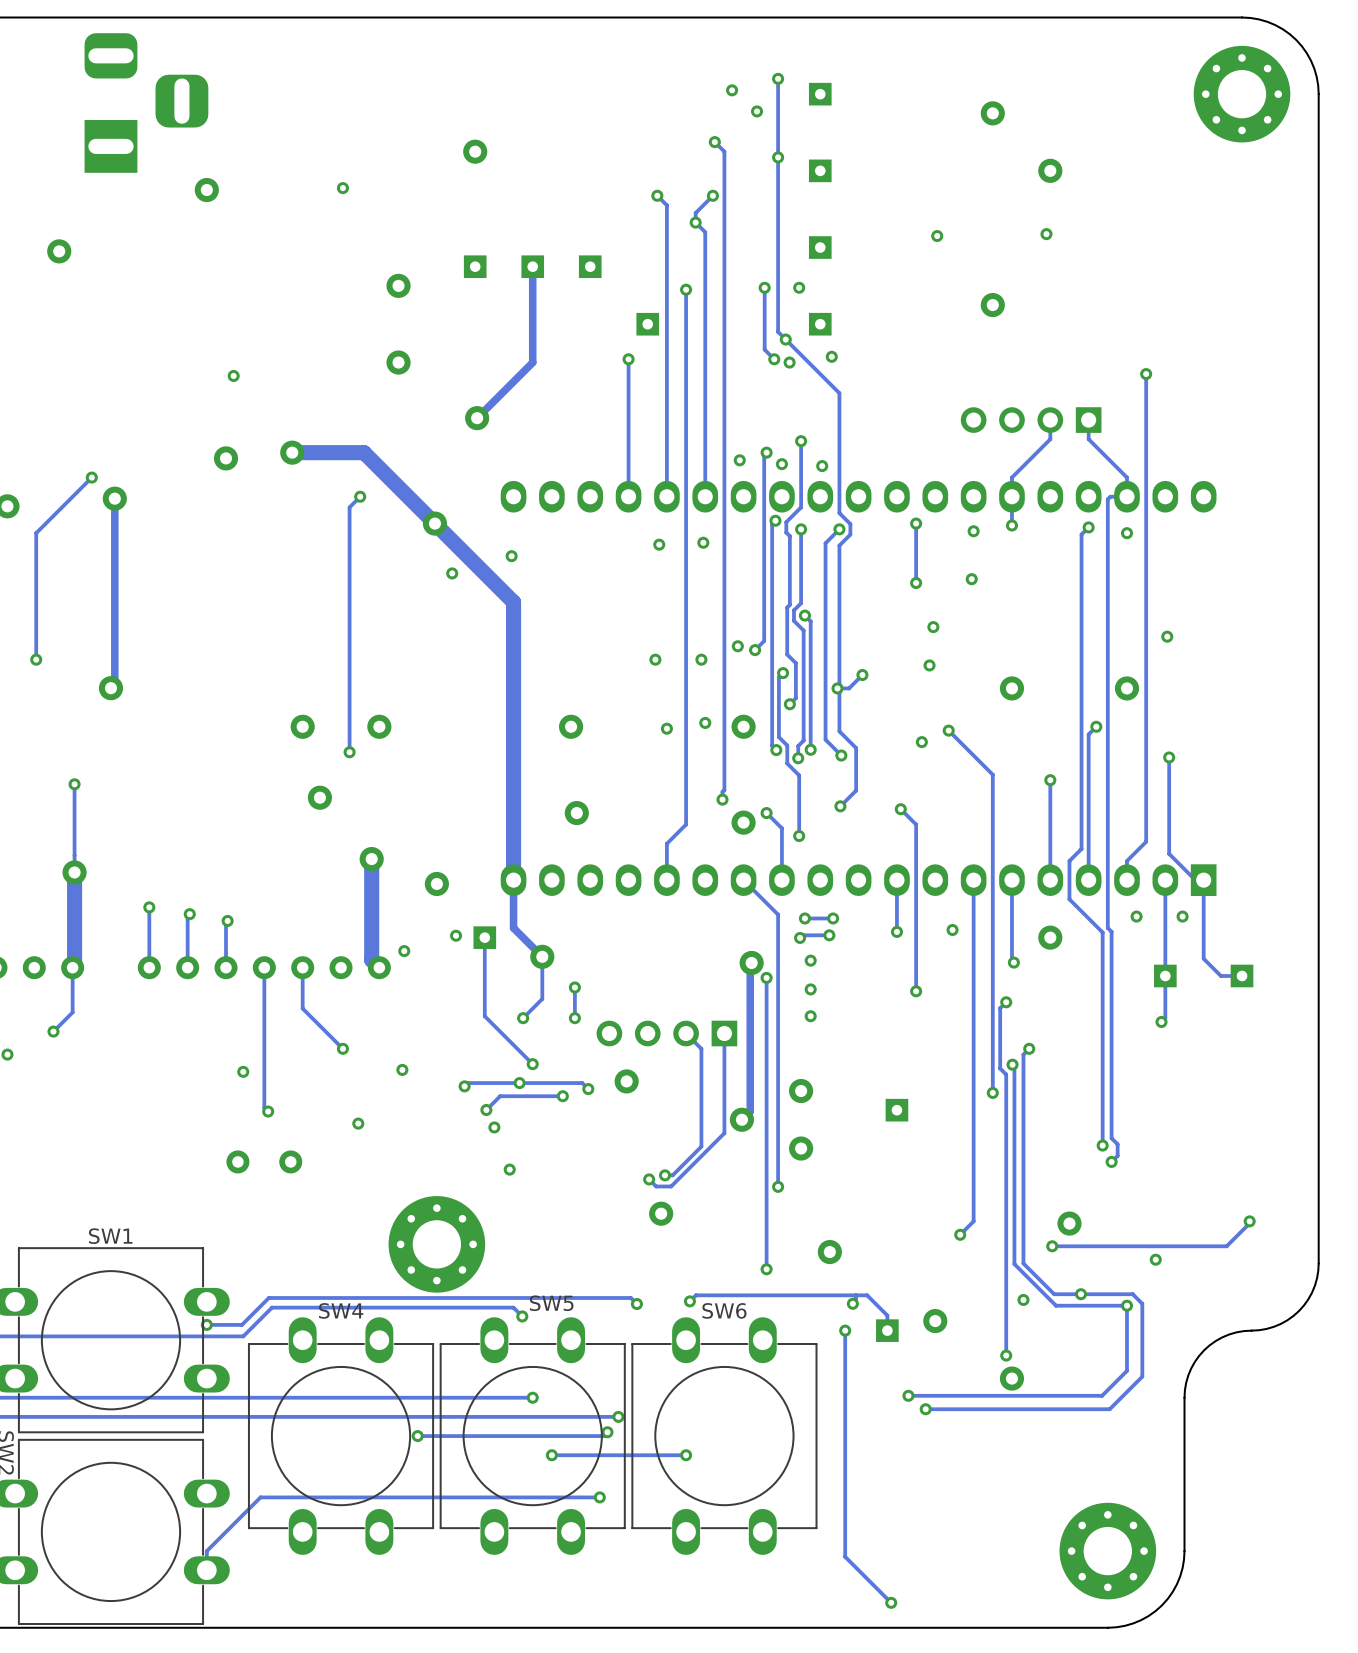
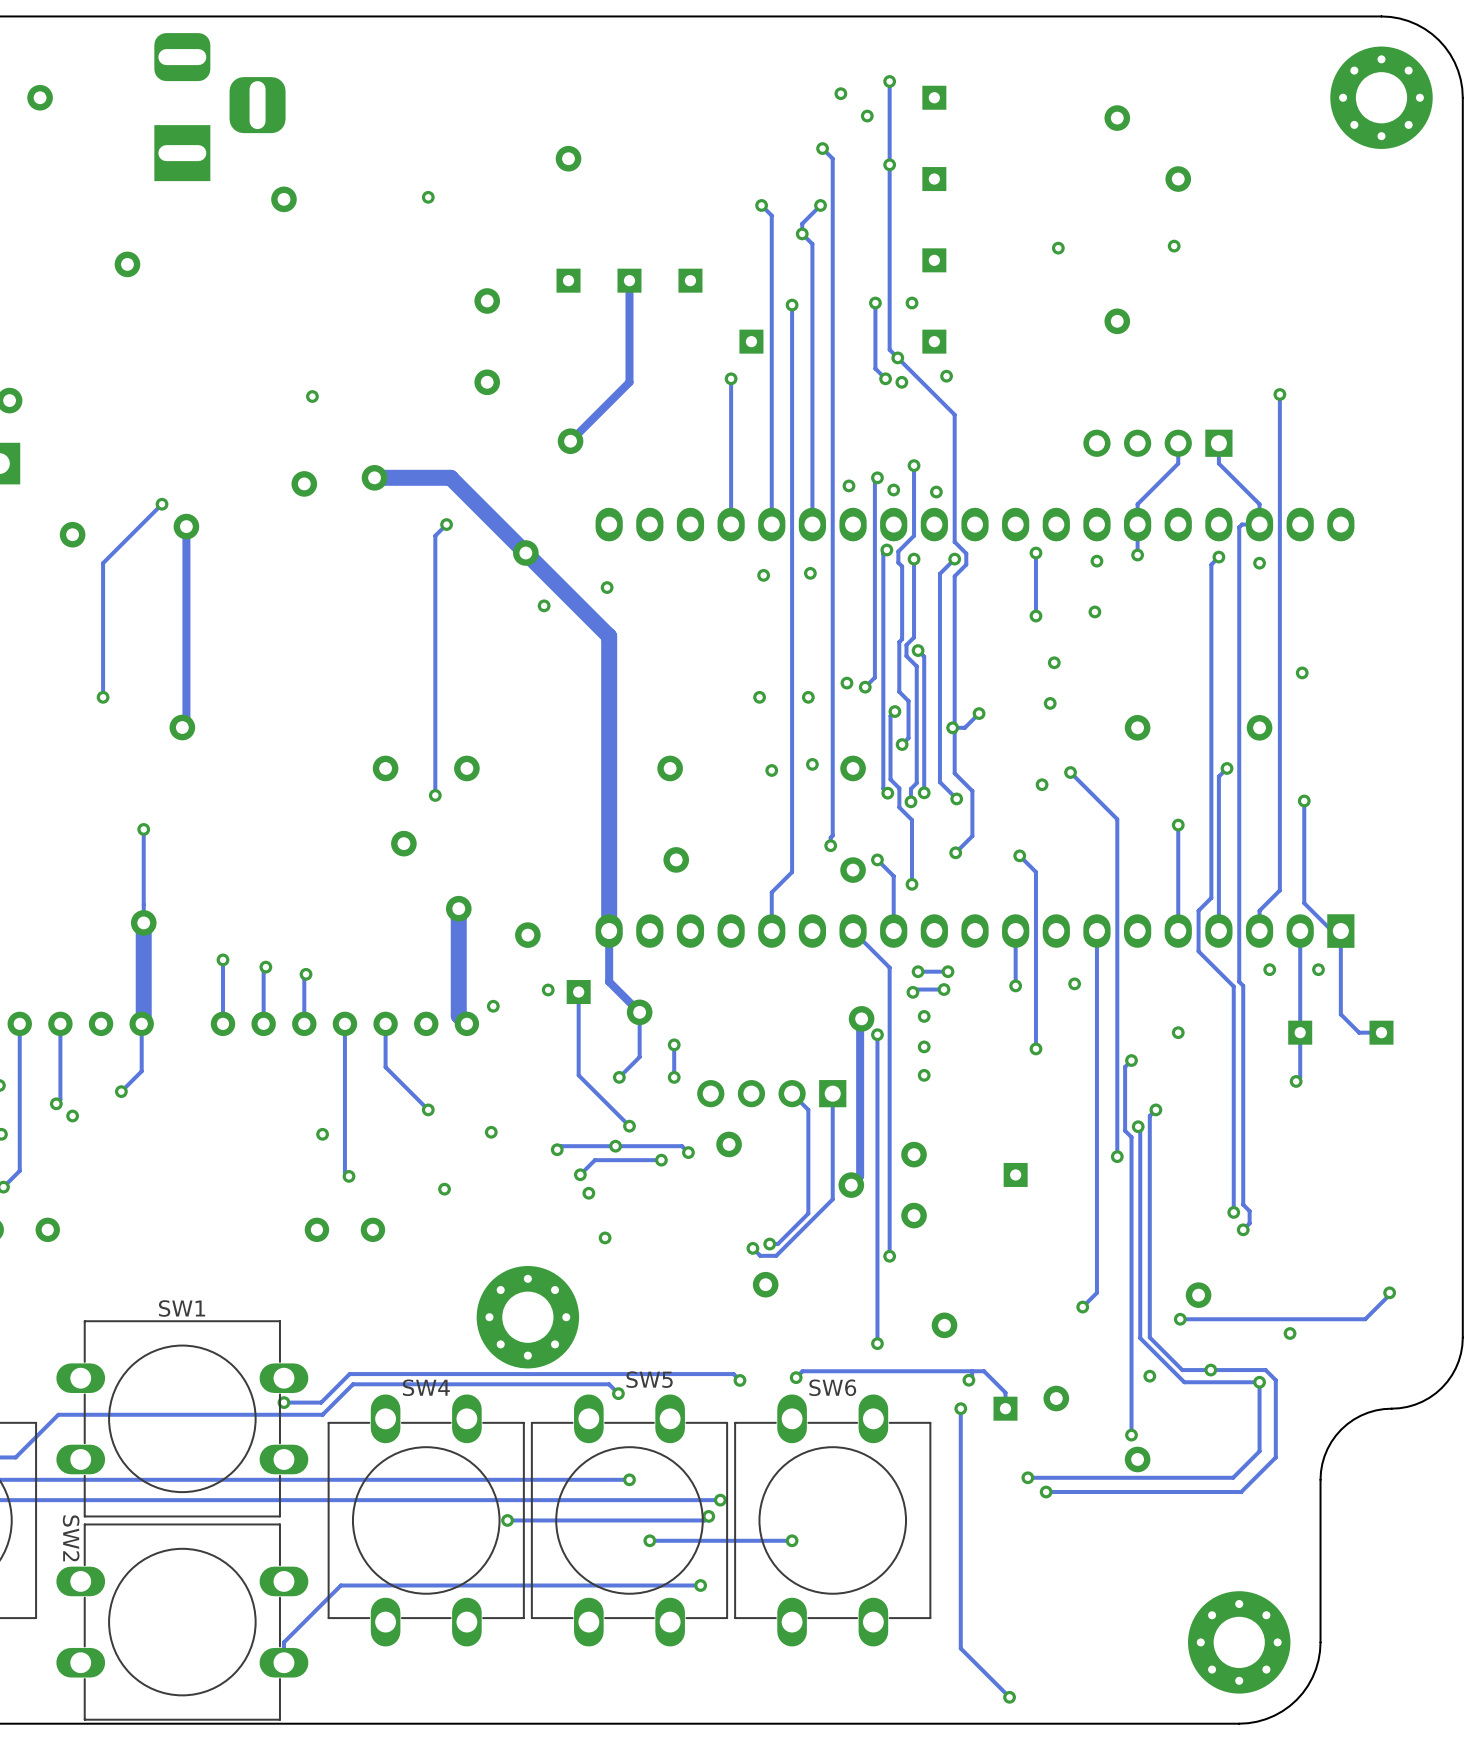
track: (1011, 880) (1011, 960) (1013, 962) -> none
via: (1050, 937) -> none
via position: (1013, 962) -> (1178, 1032)

